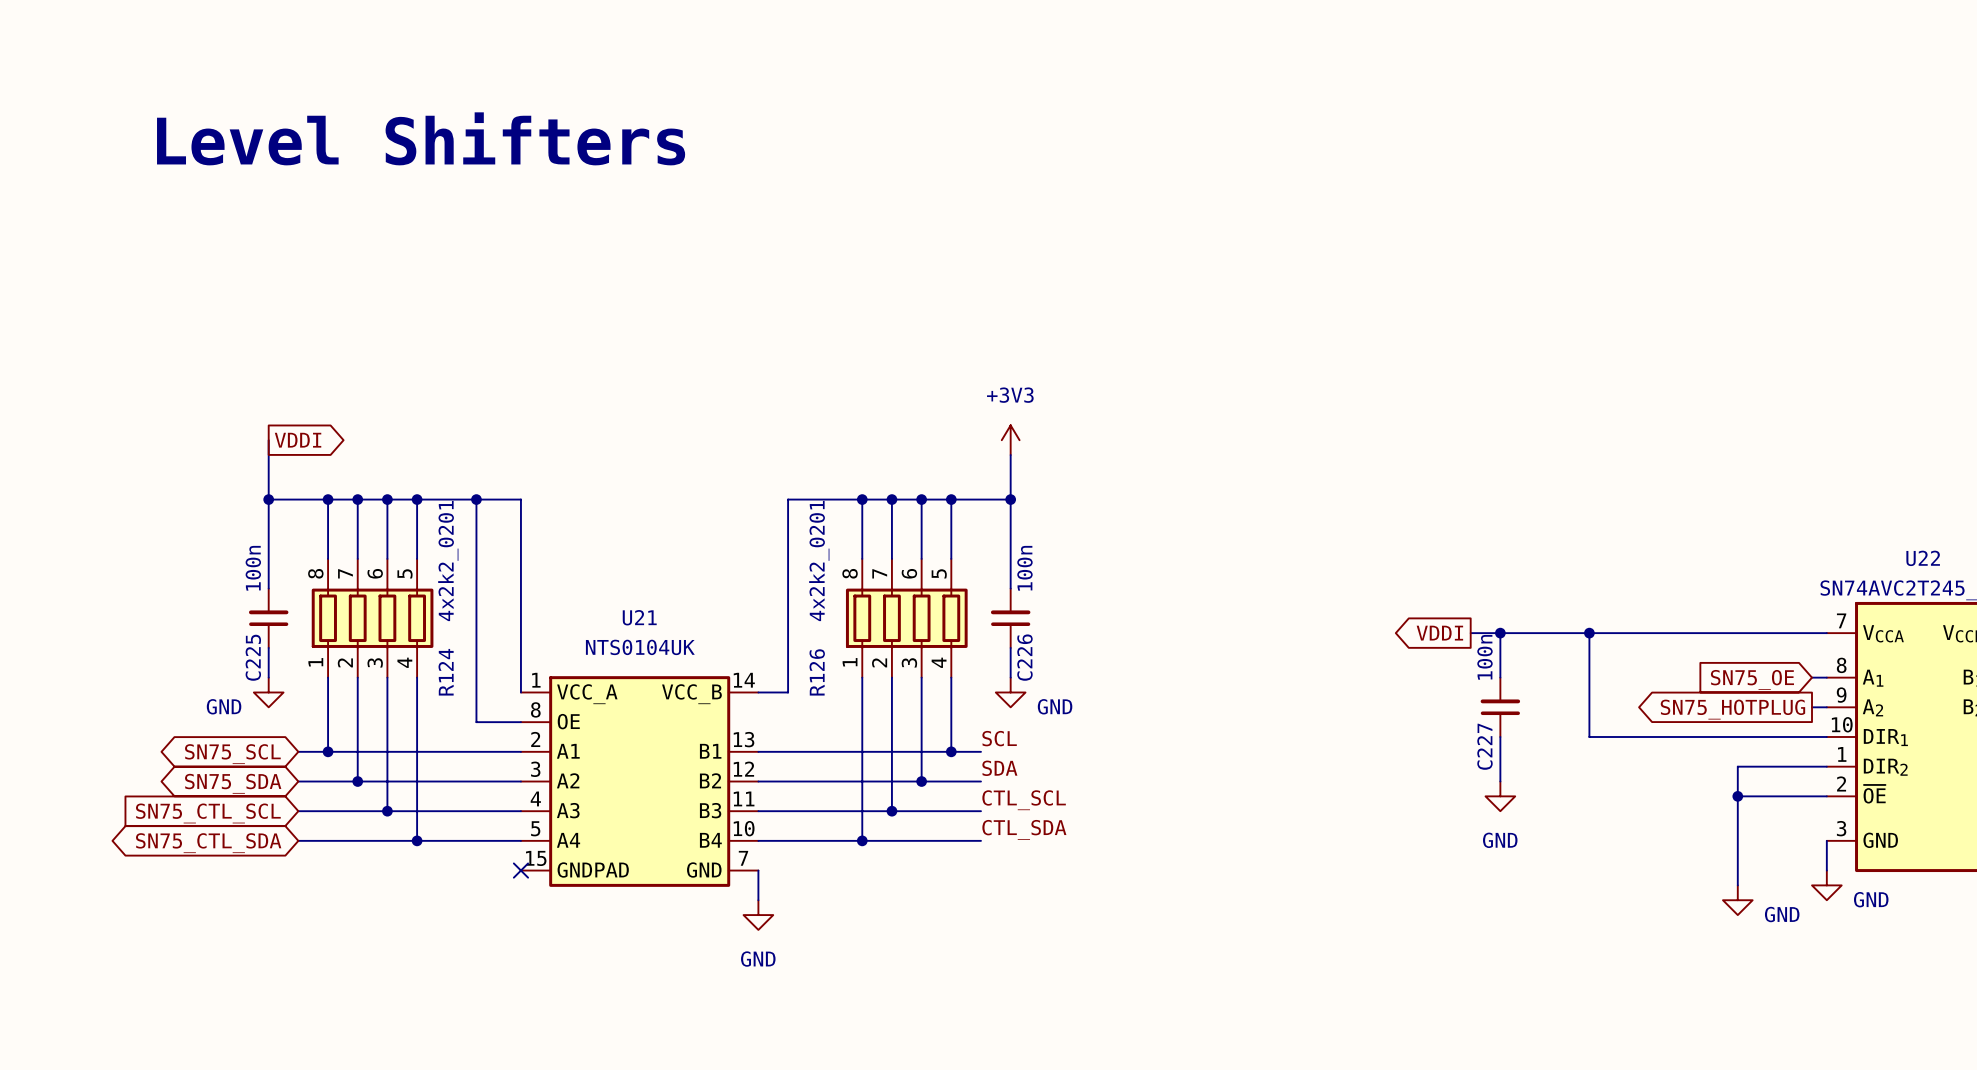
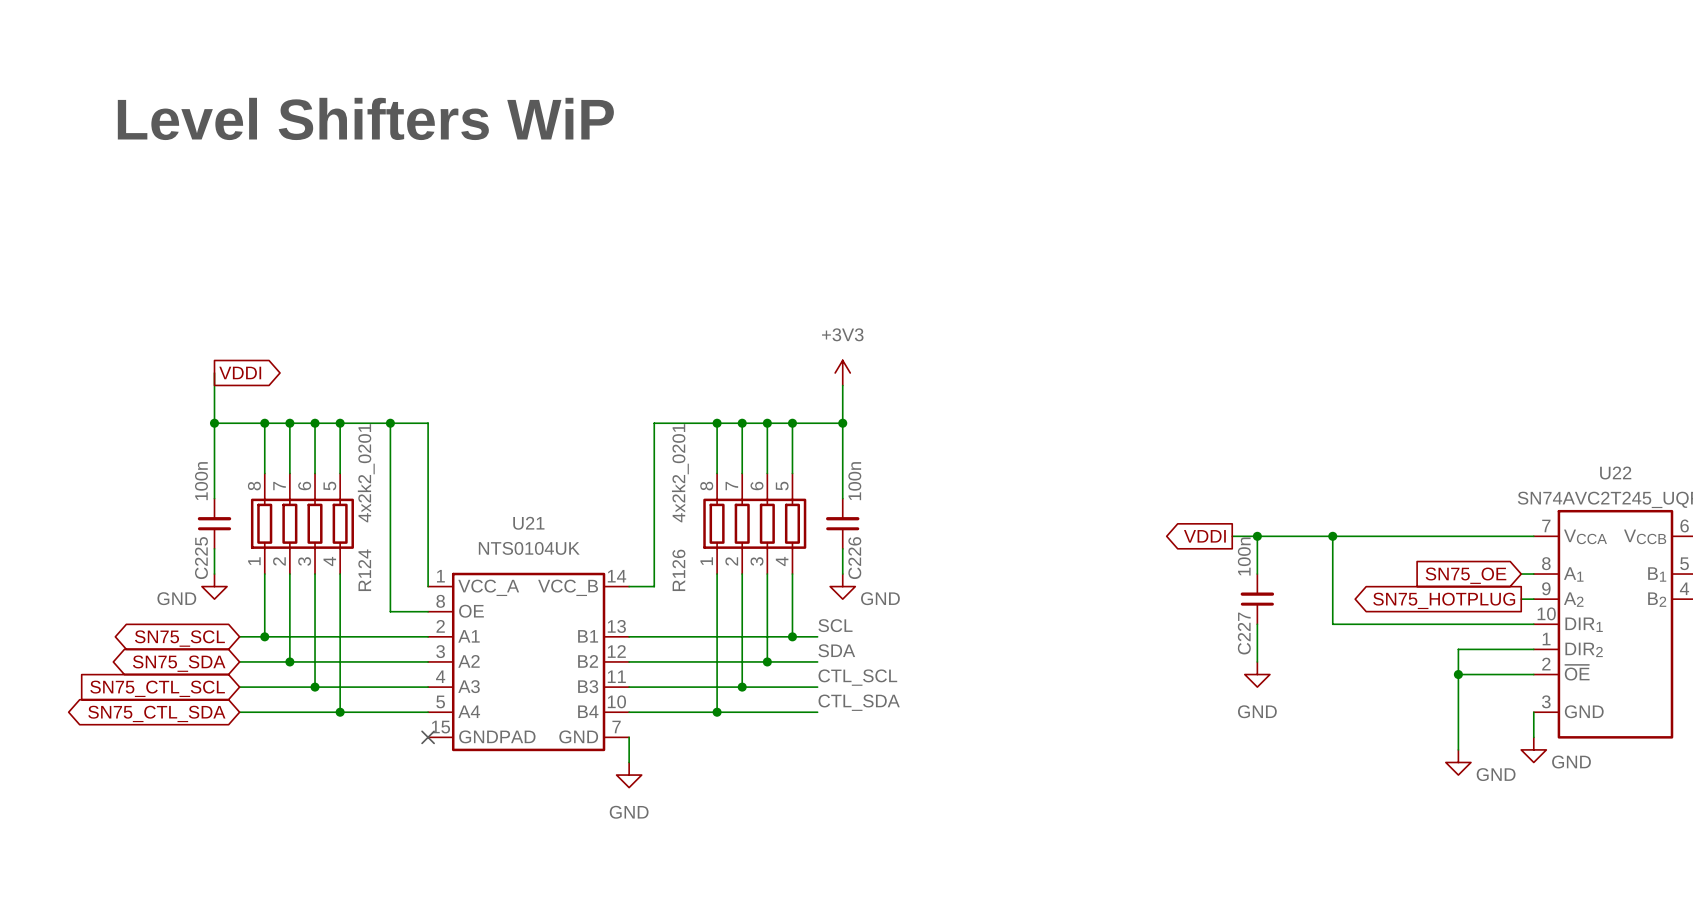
text: Level Shifters (421, 138) -> Level Shifters WiP (365, 118)

